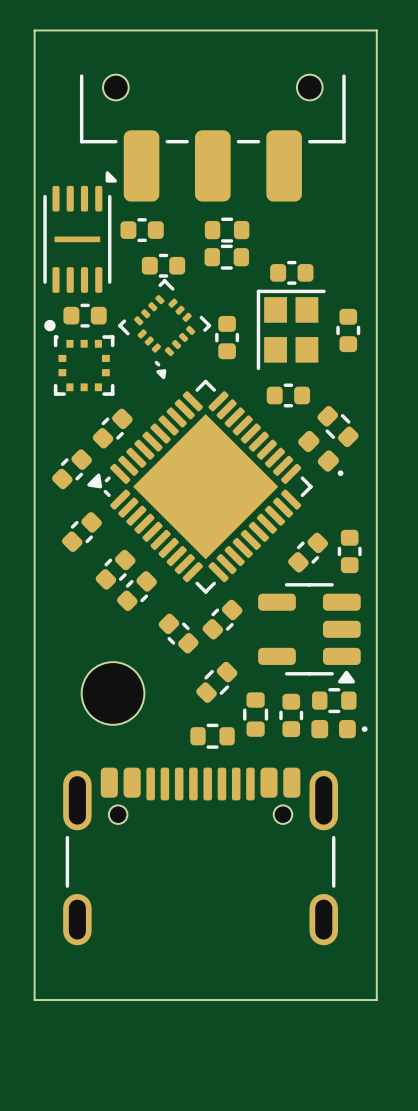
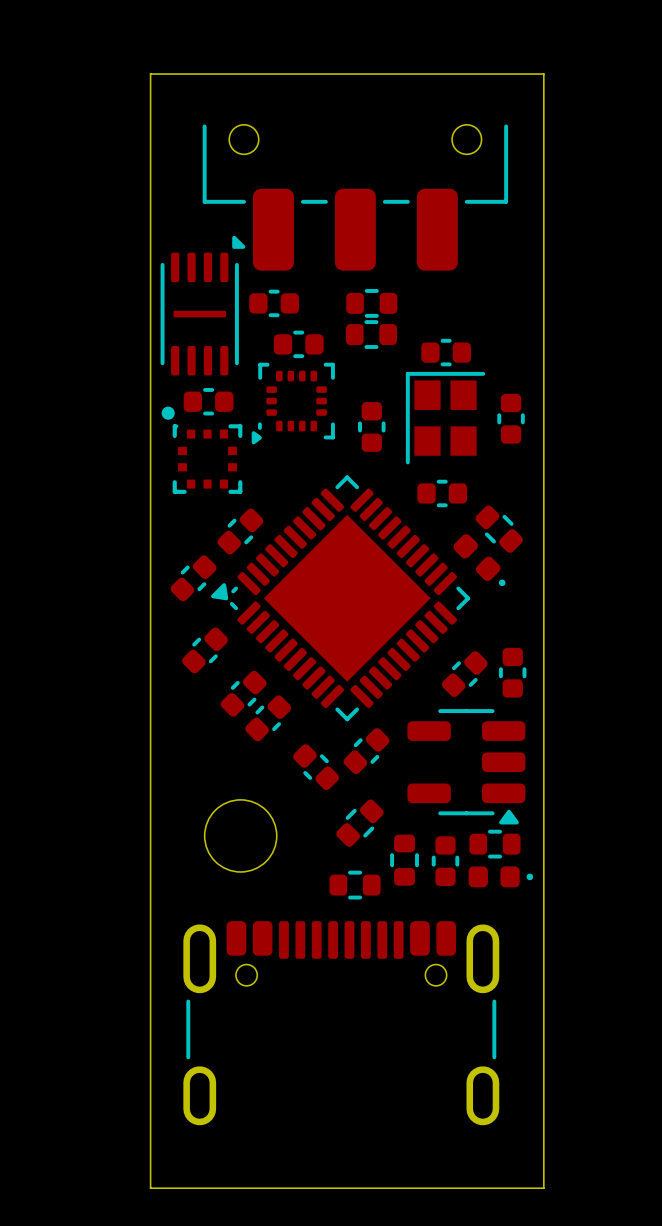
part rotation: 0° (164, 329) -> 45° clockwise (293, 403)

